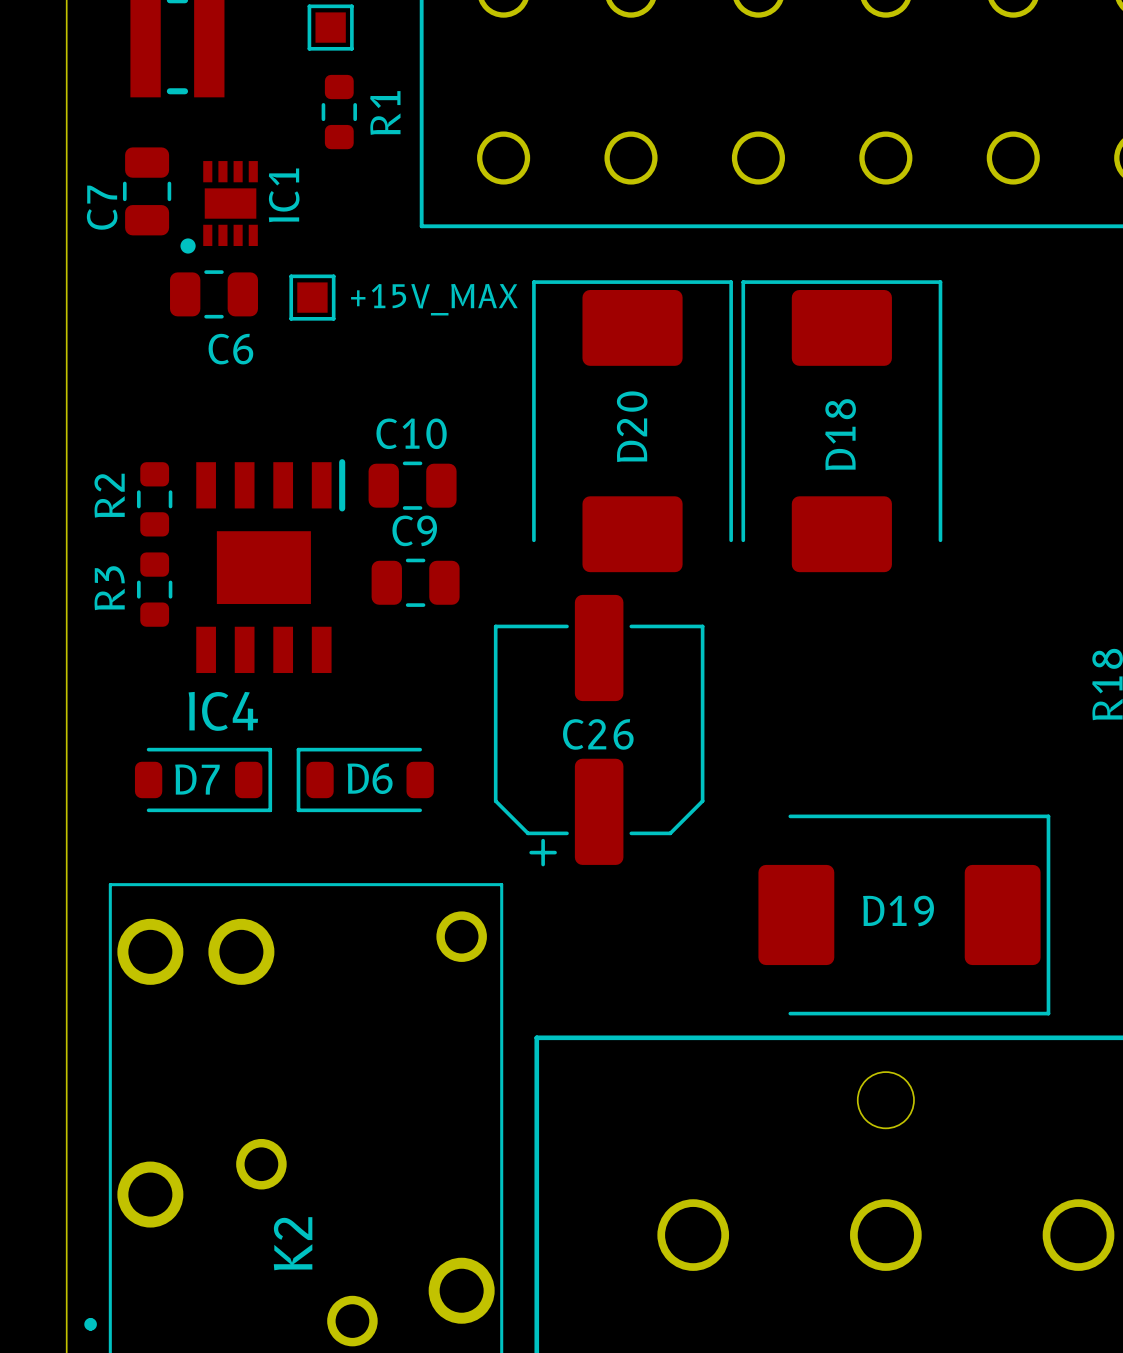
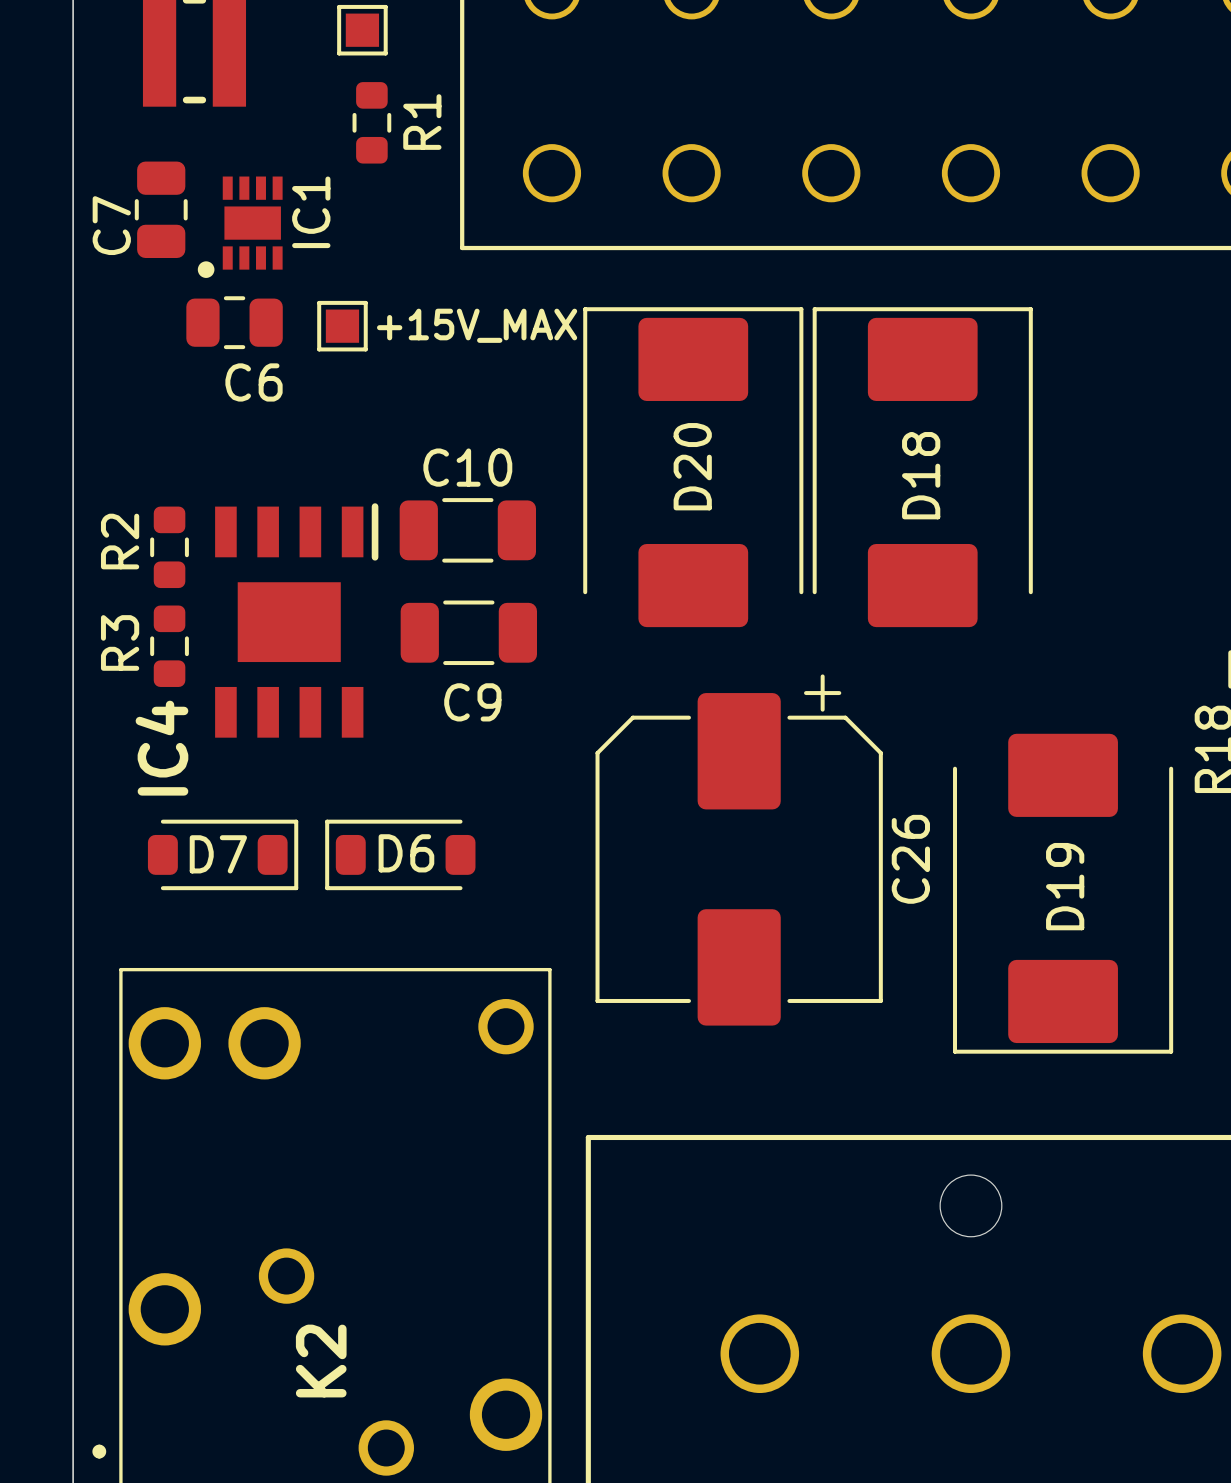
C10 footprint: [368, 461, 457, 510] -> [399, 498, 537, 563]
C9 name position: C9 (414, 530) -> C9 (472, 702)
C9 footprint: [371, 558, 460, 607] -> [400, 600, 538, 666]
C26 footprint: [493, 594, 705, 867] -> [595, 674, 883, 1026]
IC4 name rotation: 0° (223, 711) -> 90° counterclockwise (161, 748)
C26 name position: C26 (598, 734) -> C26 (910, 859)
D19 rotation: 0° (904, 914) -> 90° clockwise (1063, 893)

